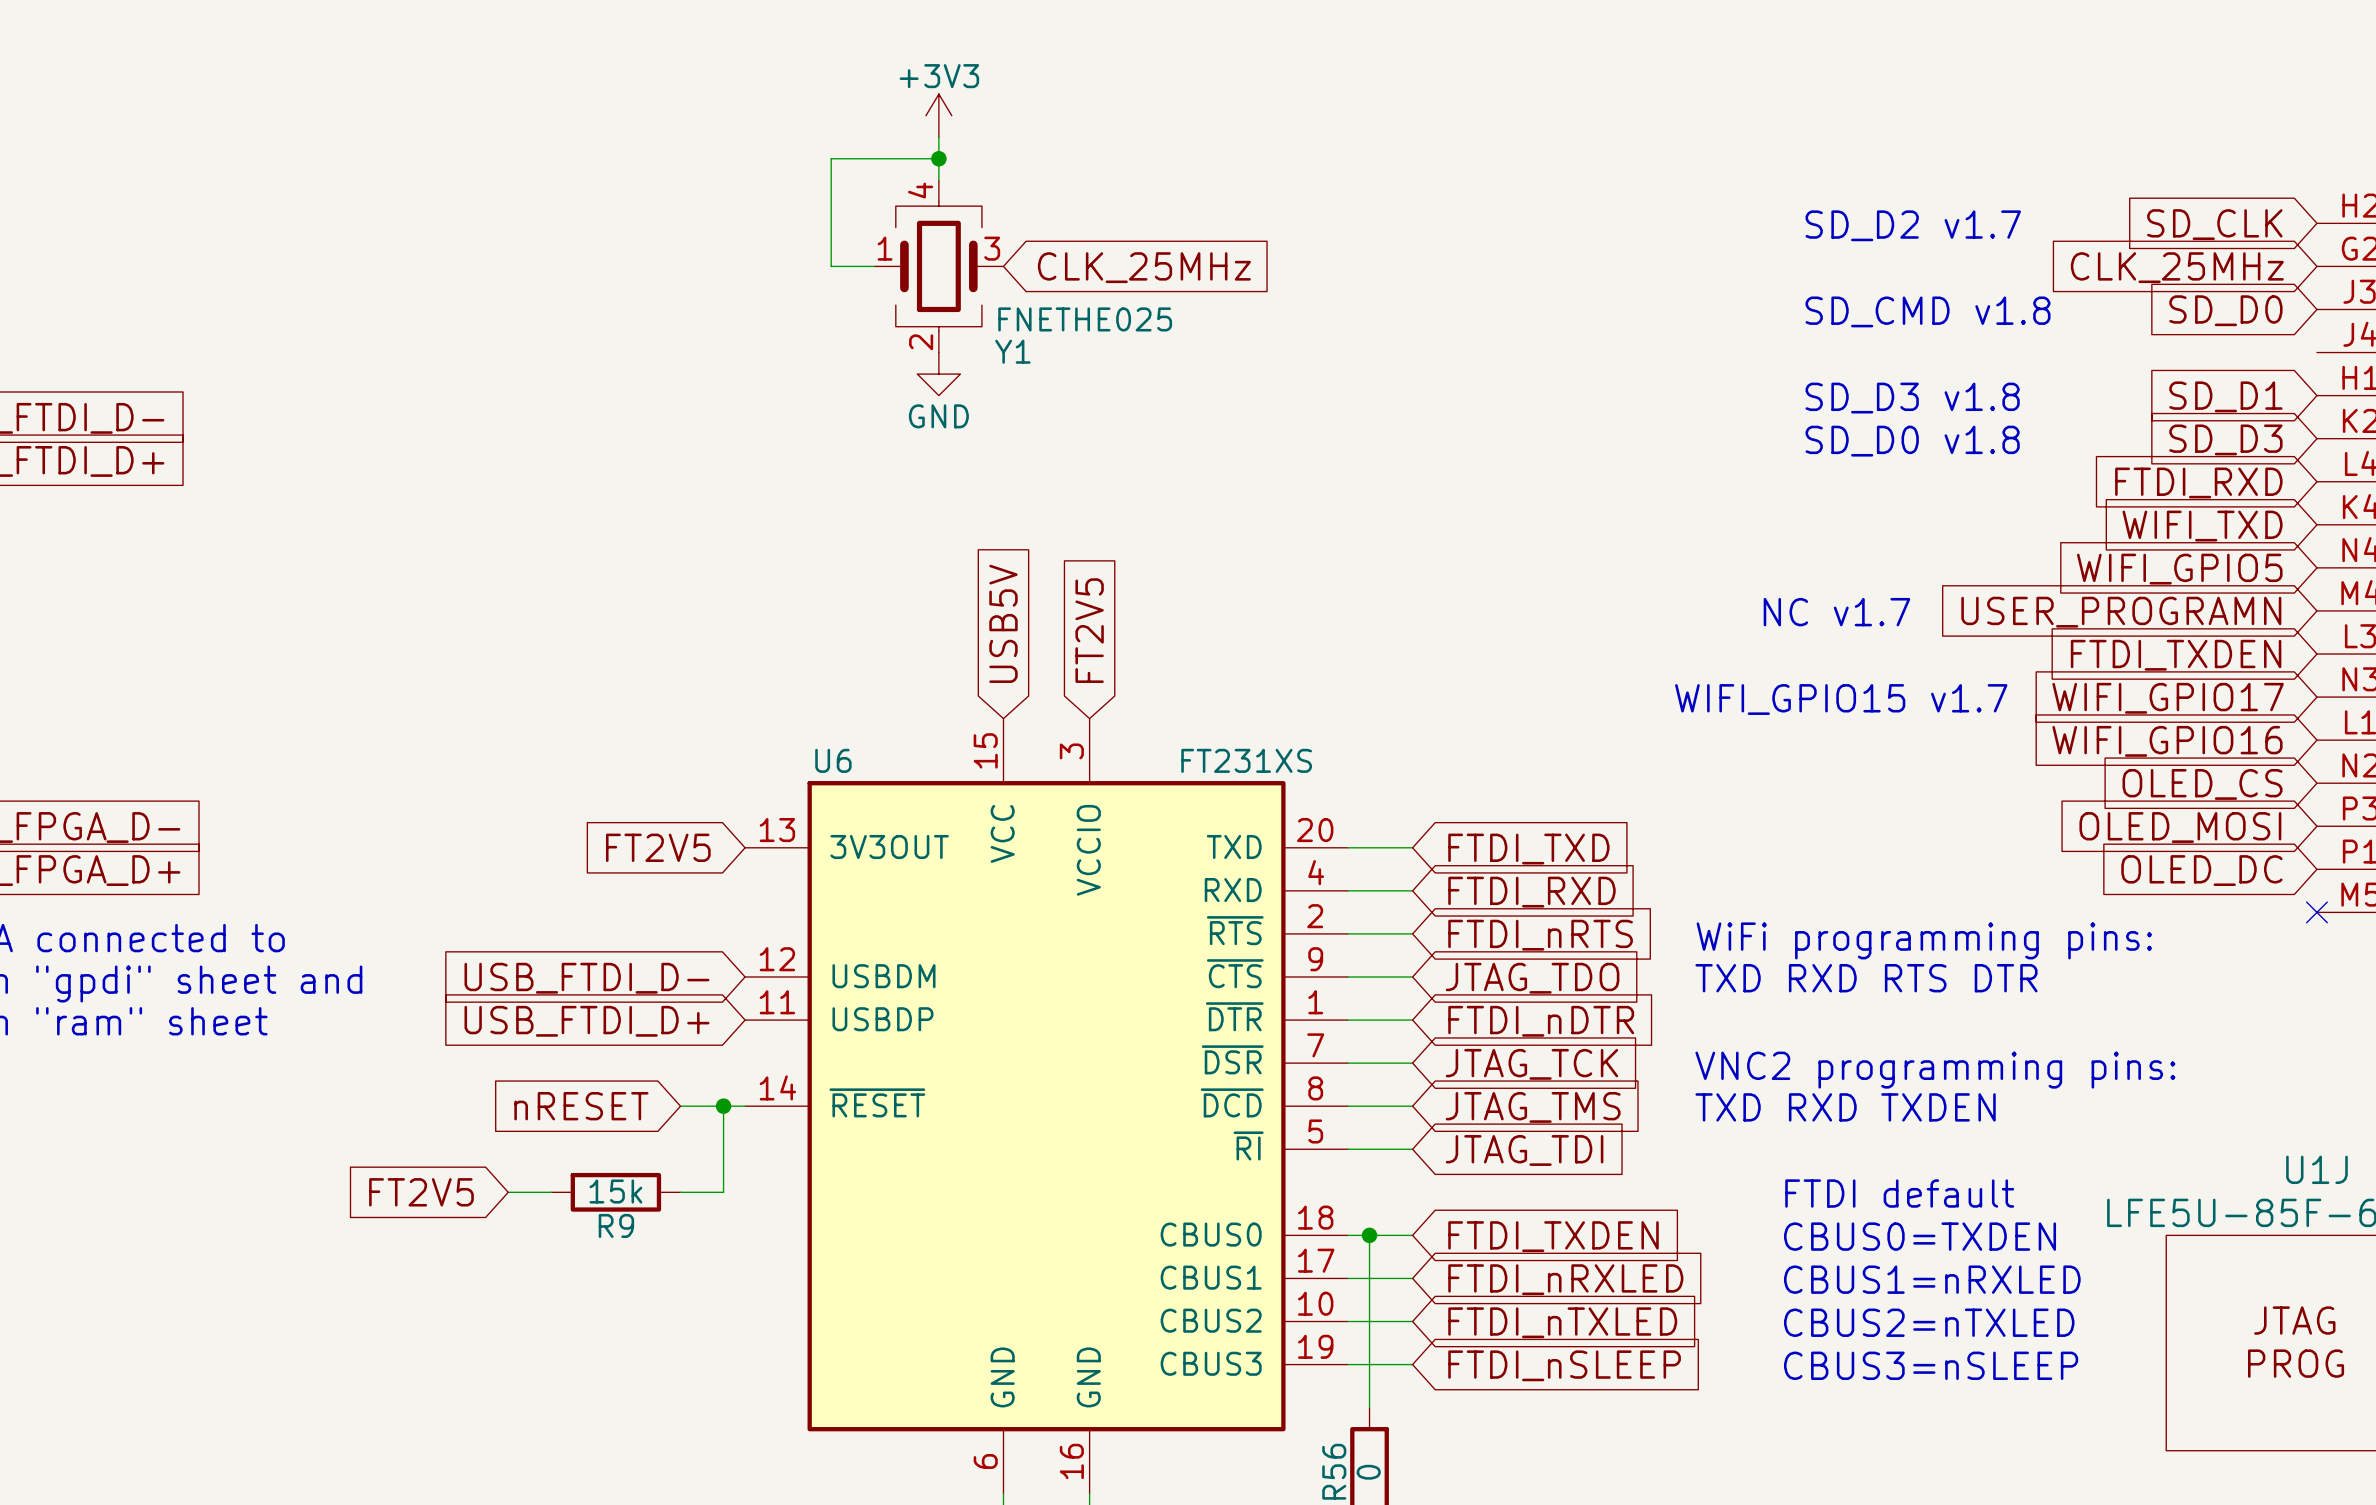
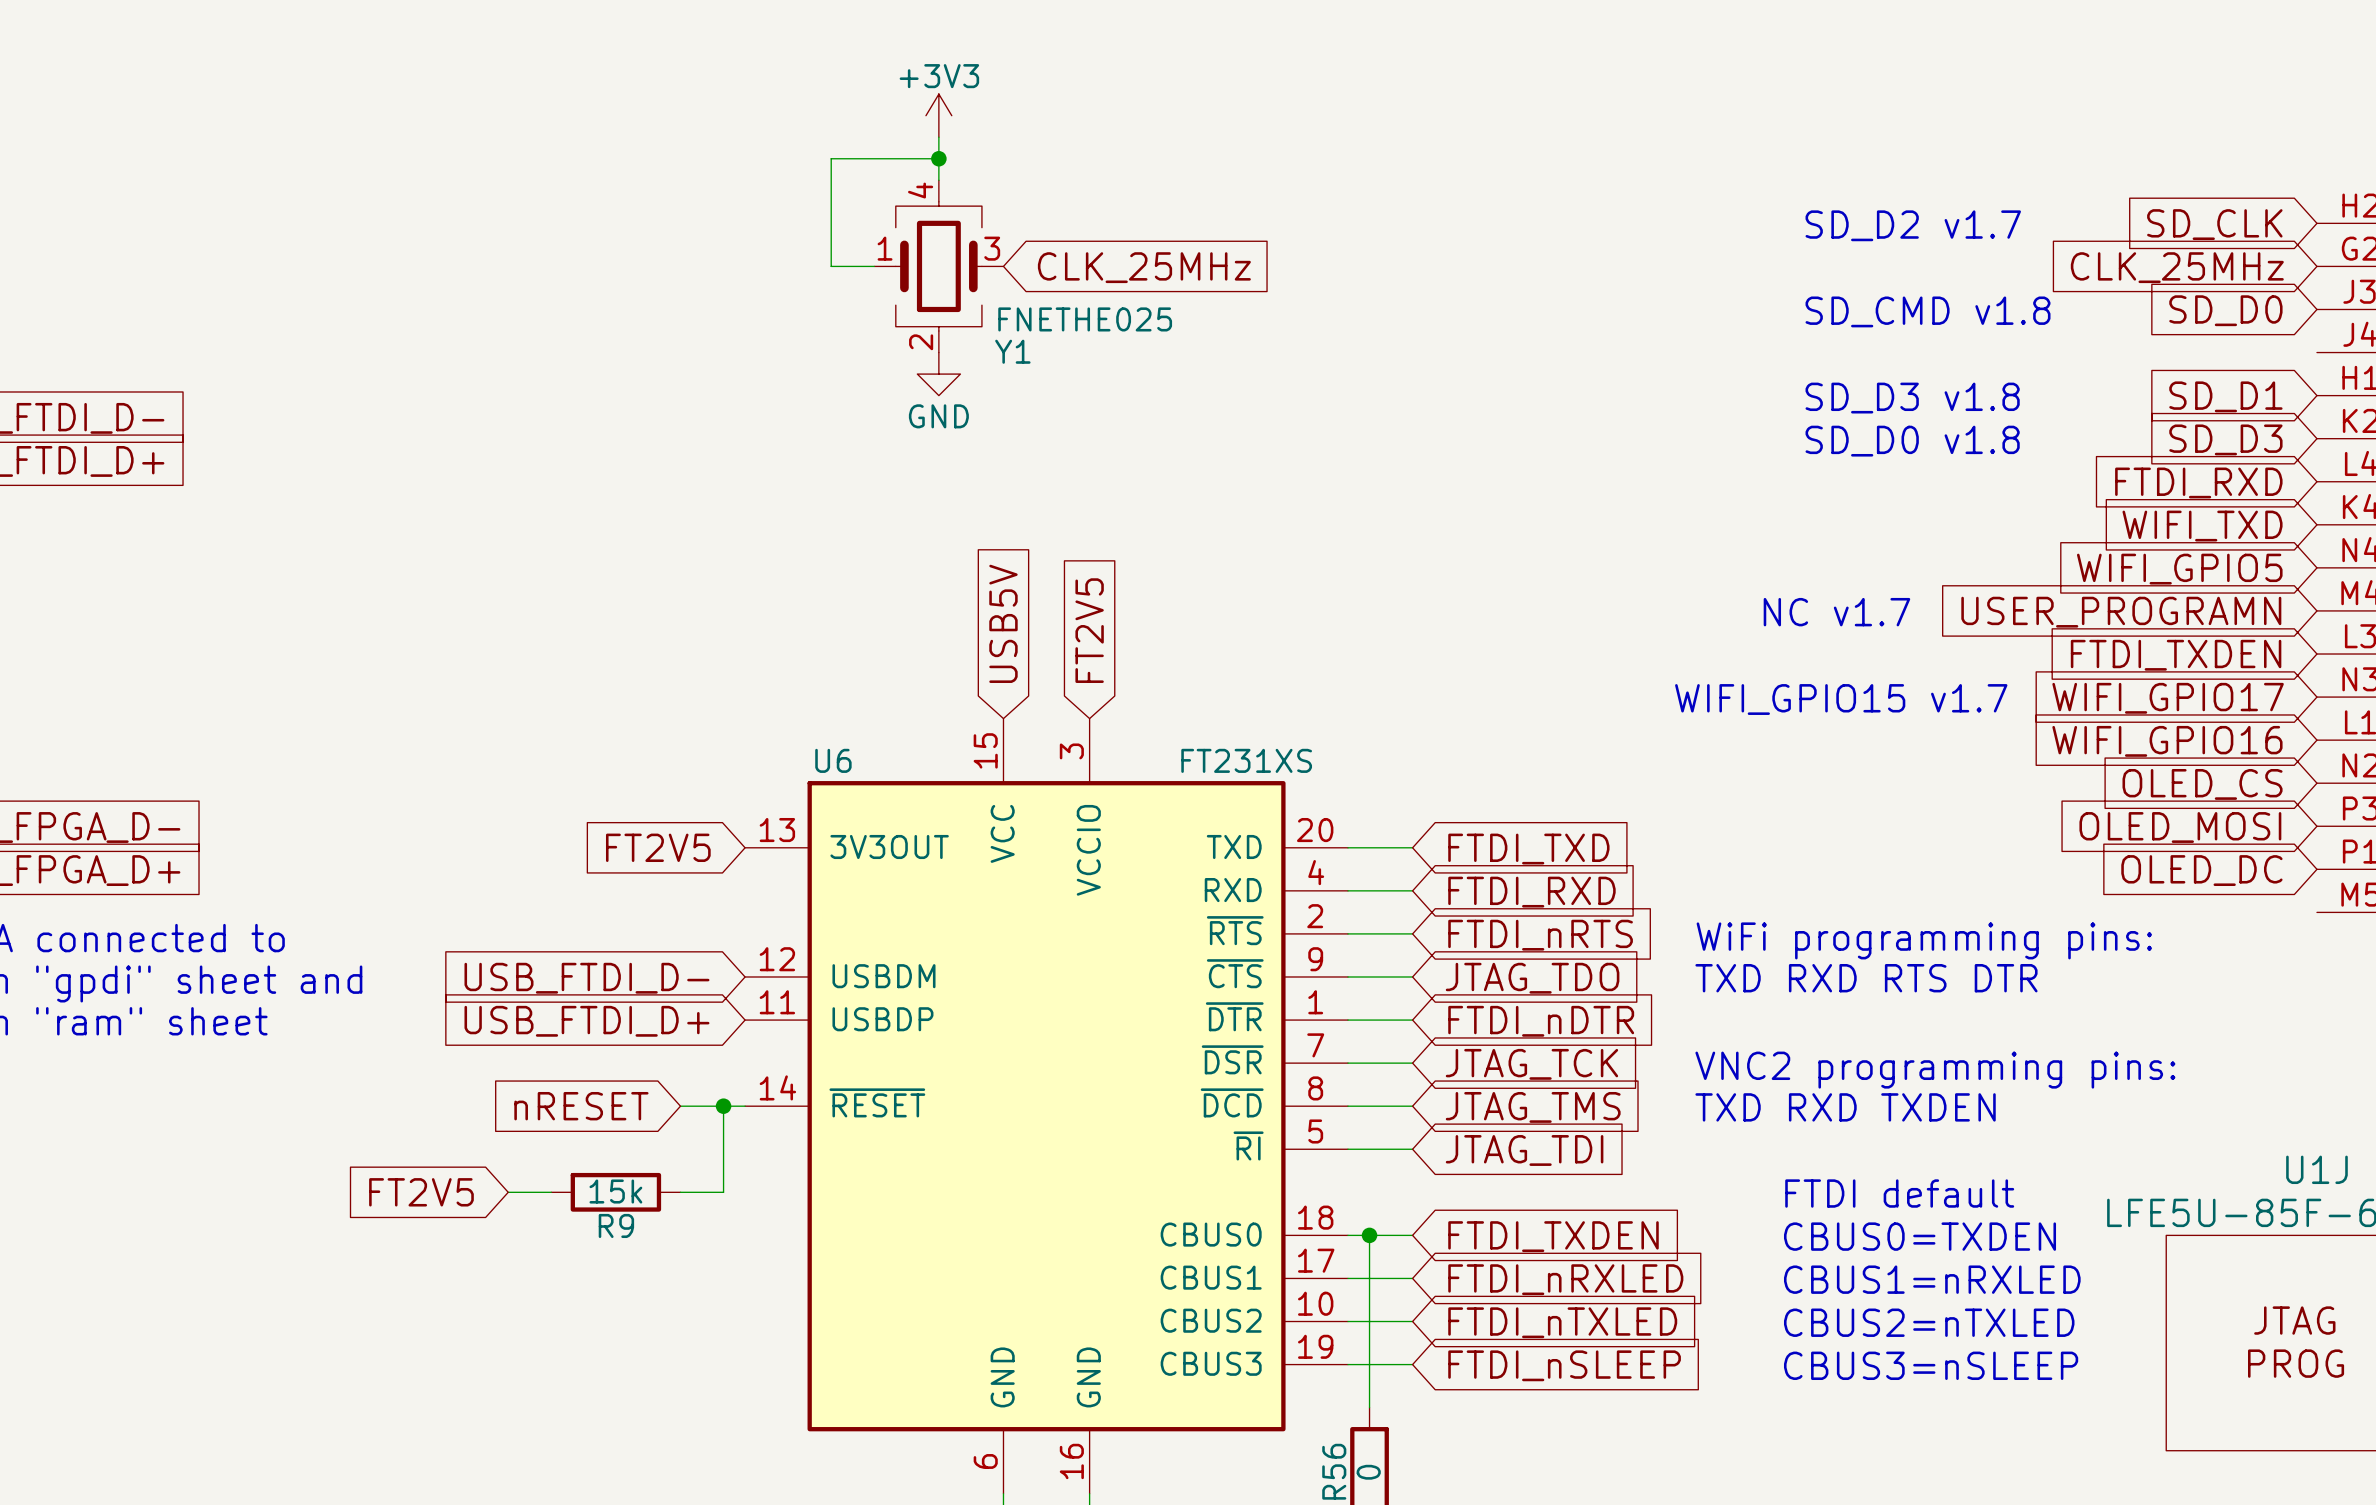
no-connect mark: (2316, 912) -> none

